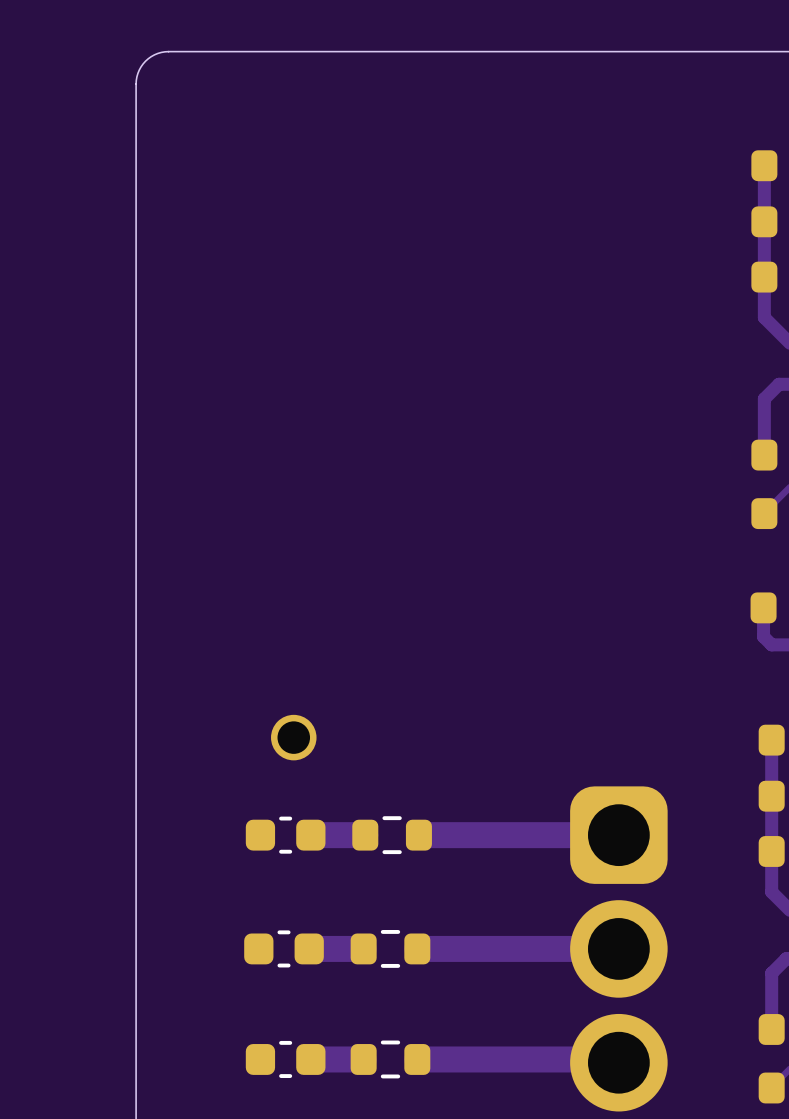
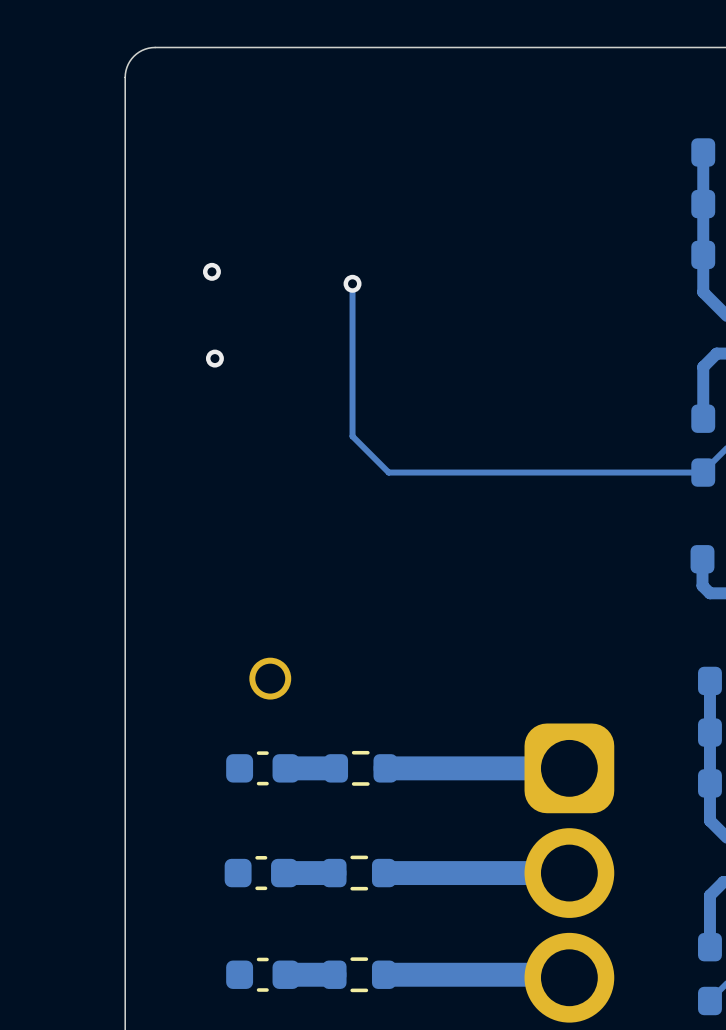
via: none -> (211, 271)
track: none -> (352, 283) (352, 436) (388, 472) (703, 472)
via: none -> (352, 283)
via: none -> (214, 358)

